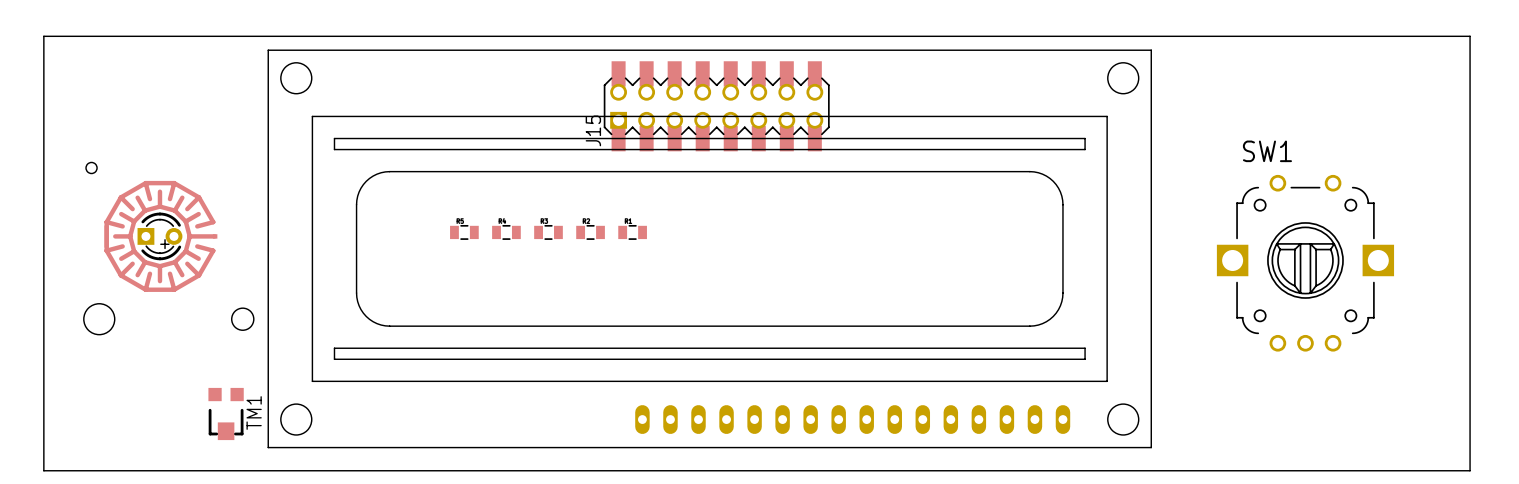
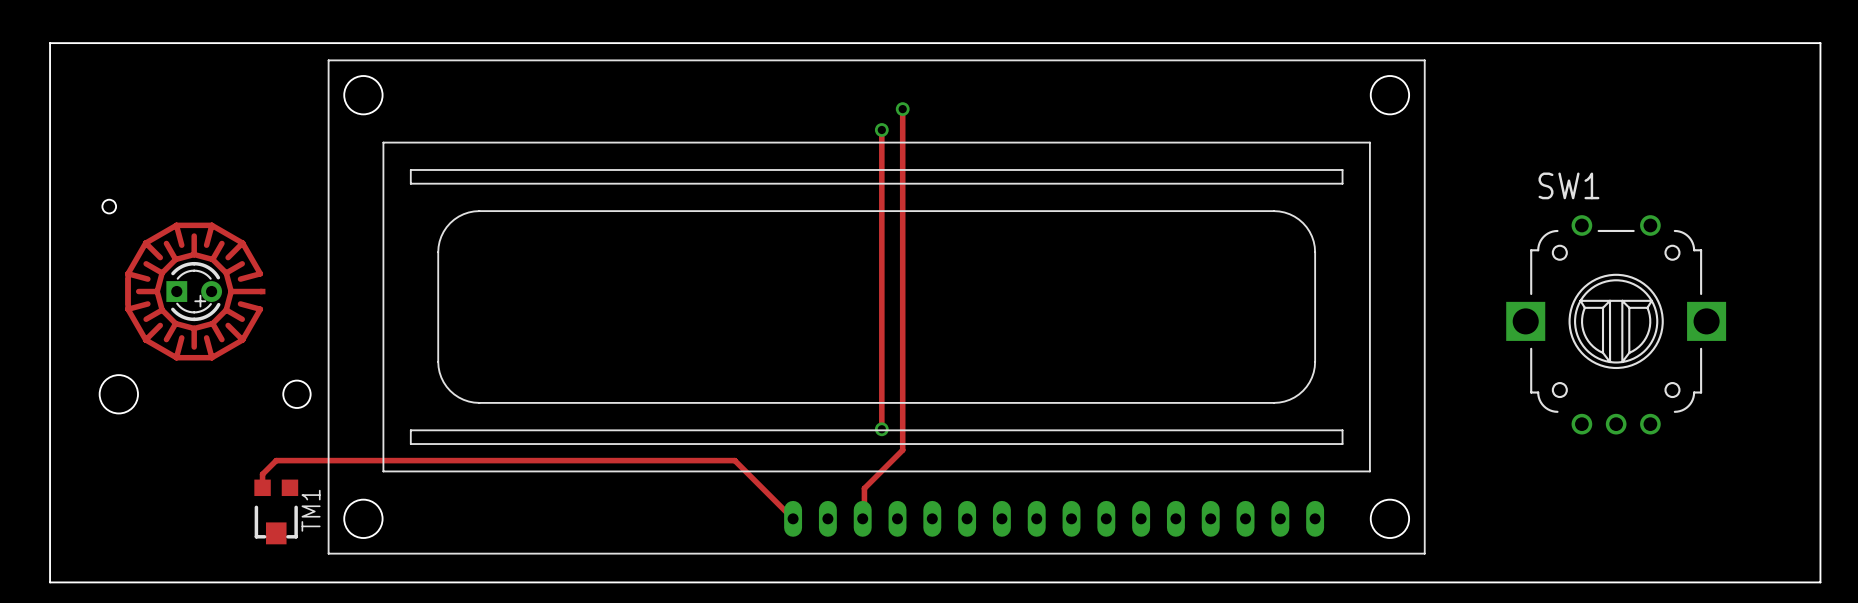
track: none -> (902, 109) (902, 450) (864, 488) (864, 517) (862, 518) (864, 516)
via: none -> (902, 109)
track: none -> (881, 129) (881, 429)
via: none -> (881, 129)
J15: (716, 106) -> none
part: (464, 232) -> none
part: (506, 232) -> none
part: (548, 232) -> none
part: (590, 232) -> none
part: (632, 232) -> none
via: none -> (881, 429)
track: none -> (262, 487) (262, 474) (276, 460) (734, 460) (793, 518)

